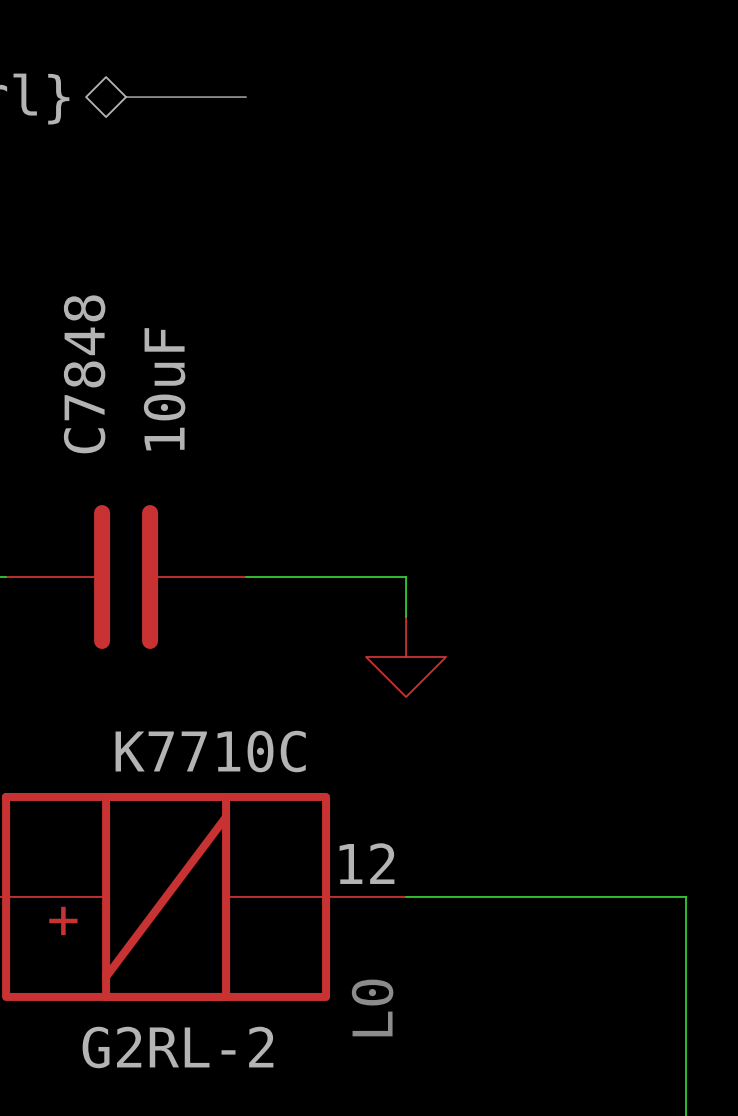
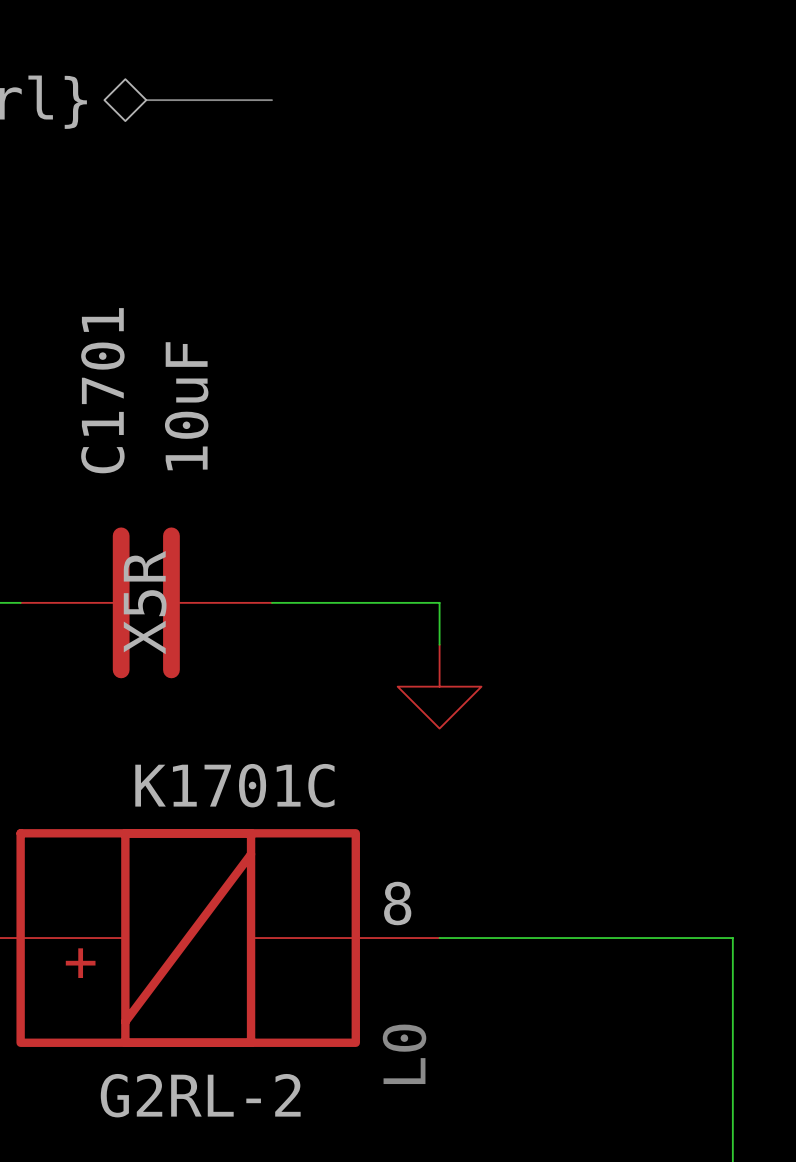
C7848 name: C7848 (84, 374) -> C1701 (102, 390)
C7848 text: none -> X5R (145, 602)
K7710C name: K7710C (210, 751) -> K1701C (234, 785)
K7710C pin number: 12 (367, 863) -> 8 (397, 903)

